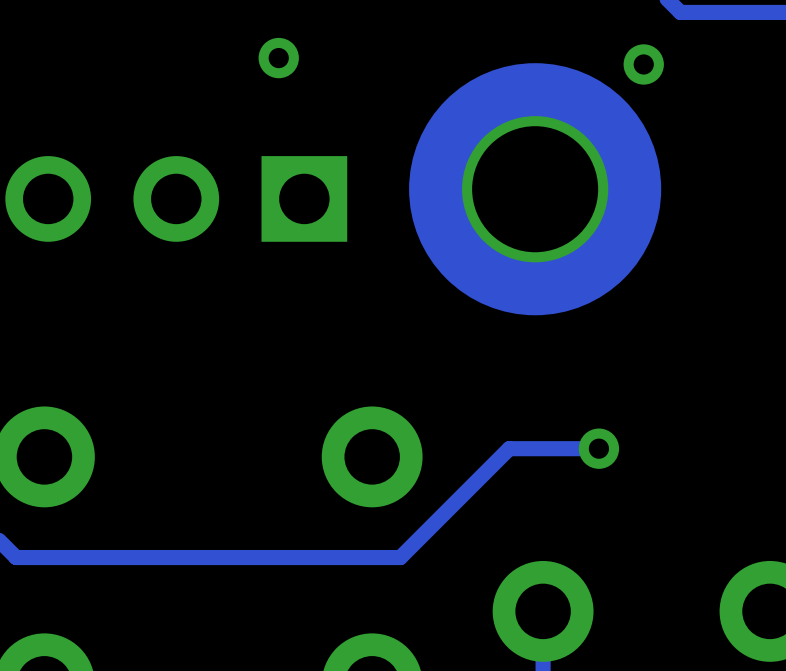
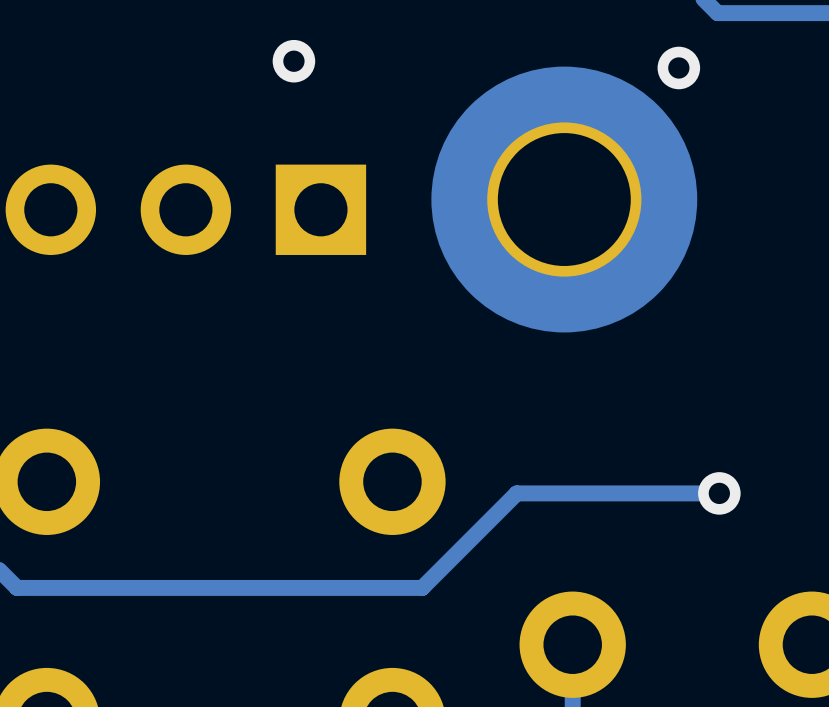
track: (598, 448) (509, 448) (490, 467) -> (719, 493) (516, 493)
via position: (598, 448) -> (719, 493)

